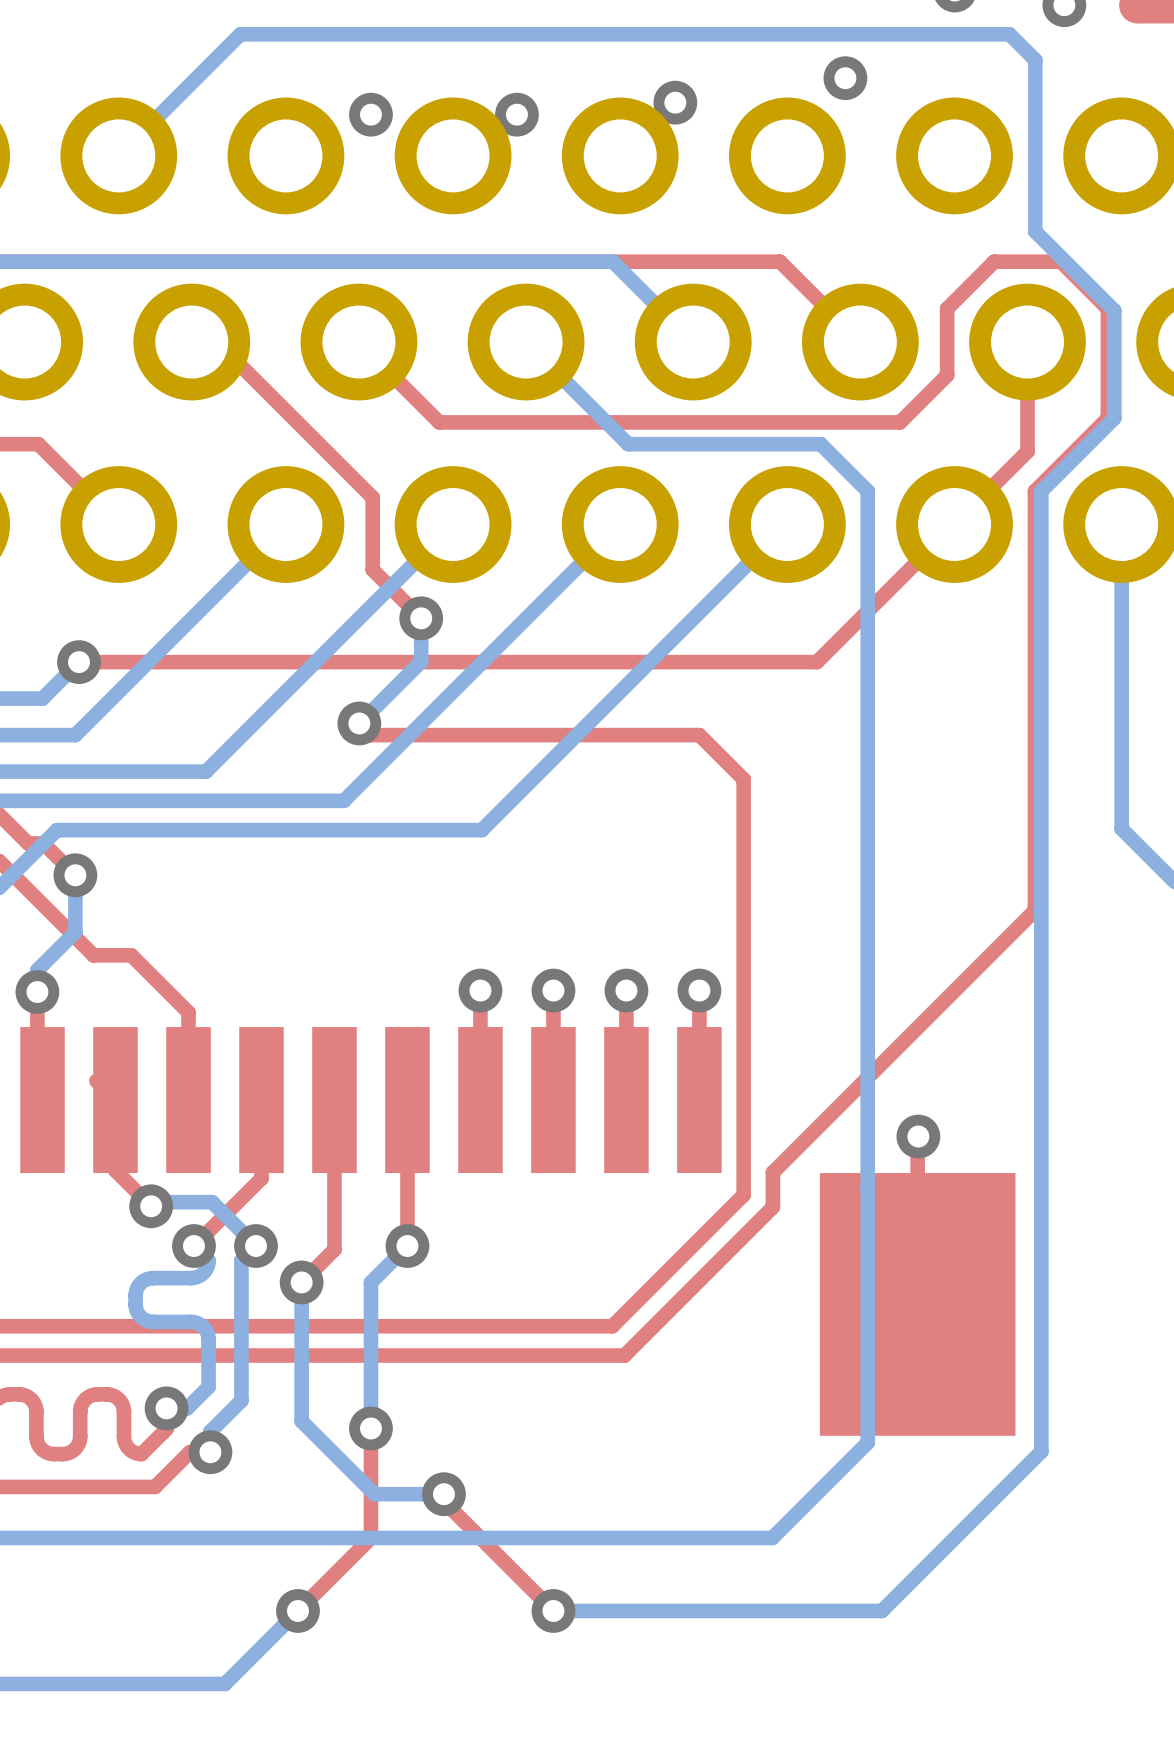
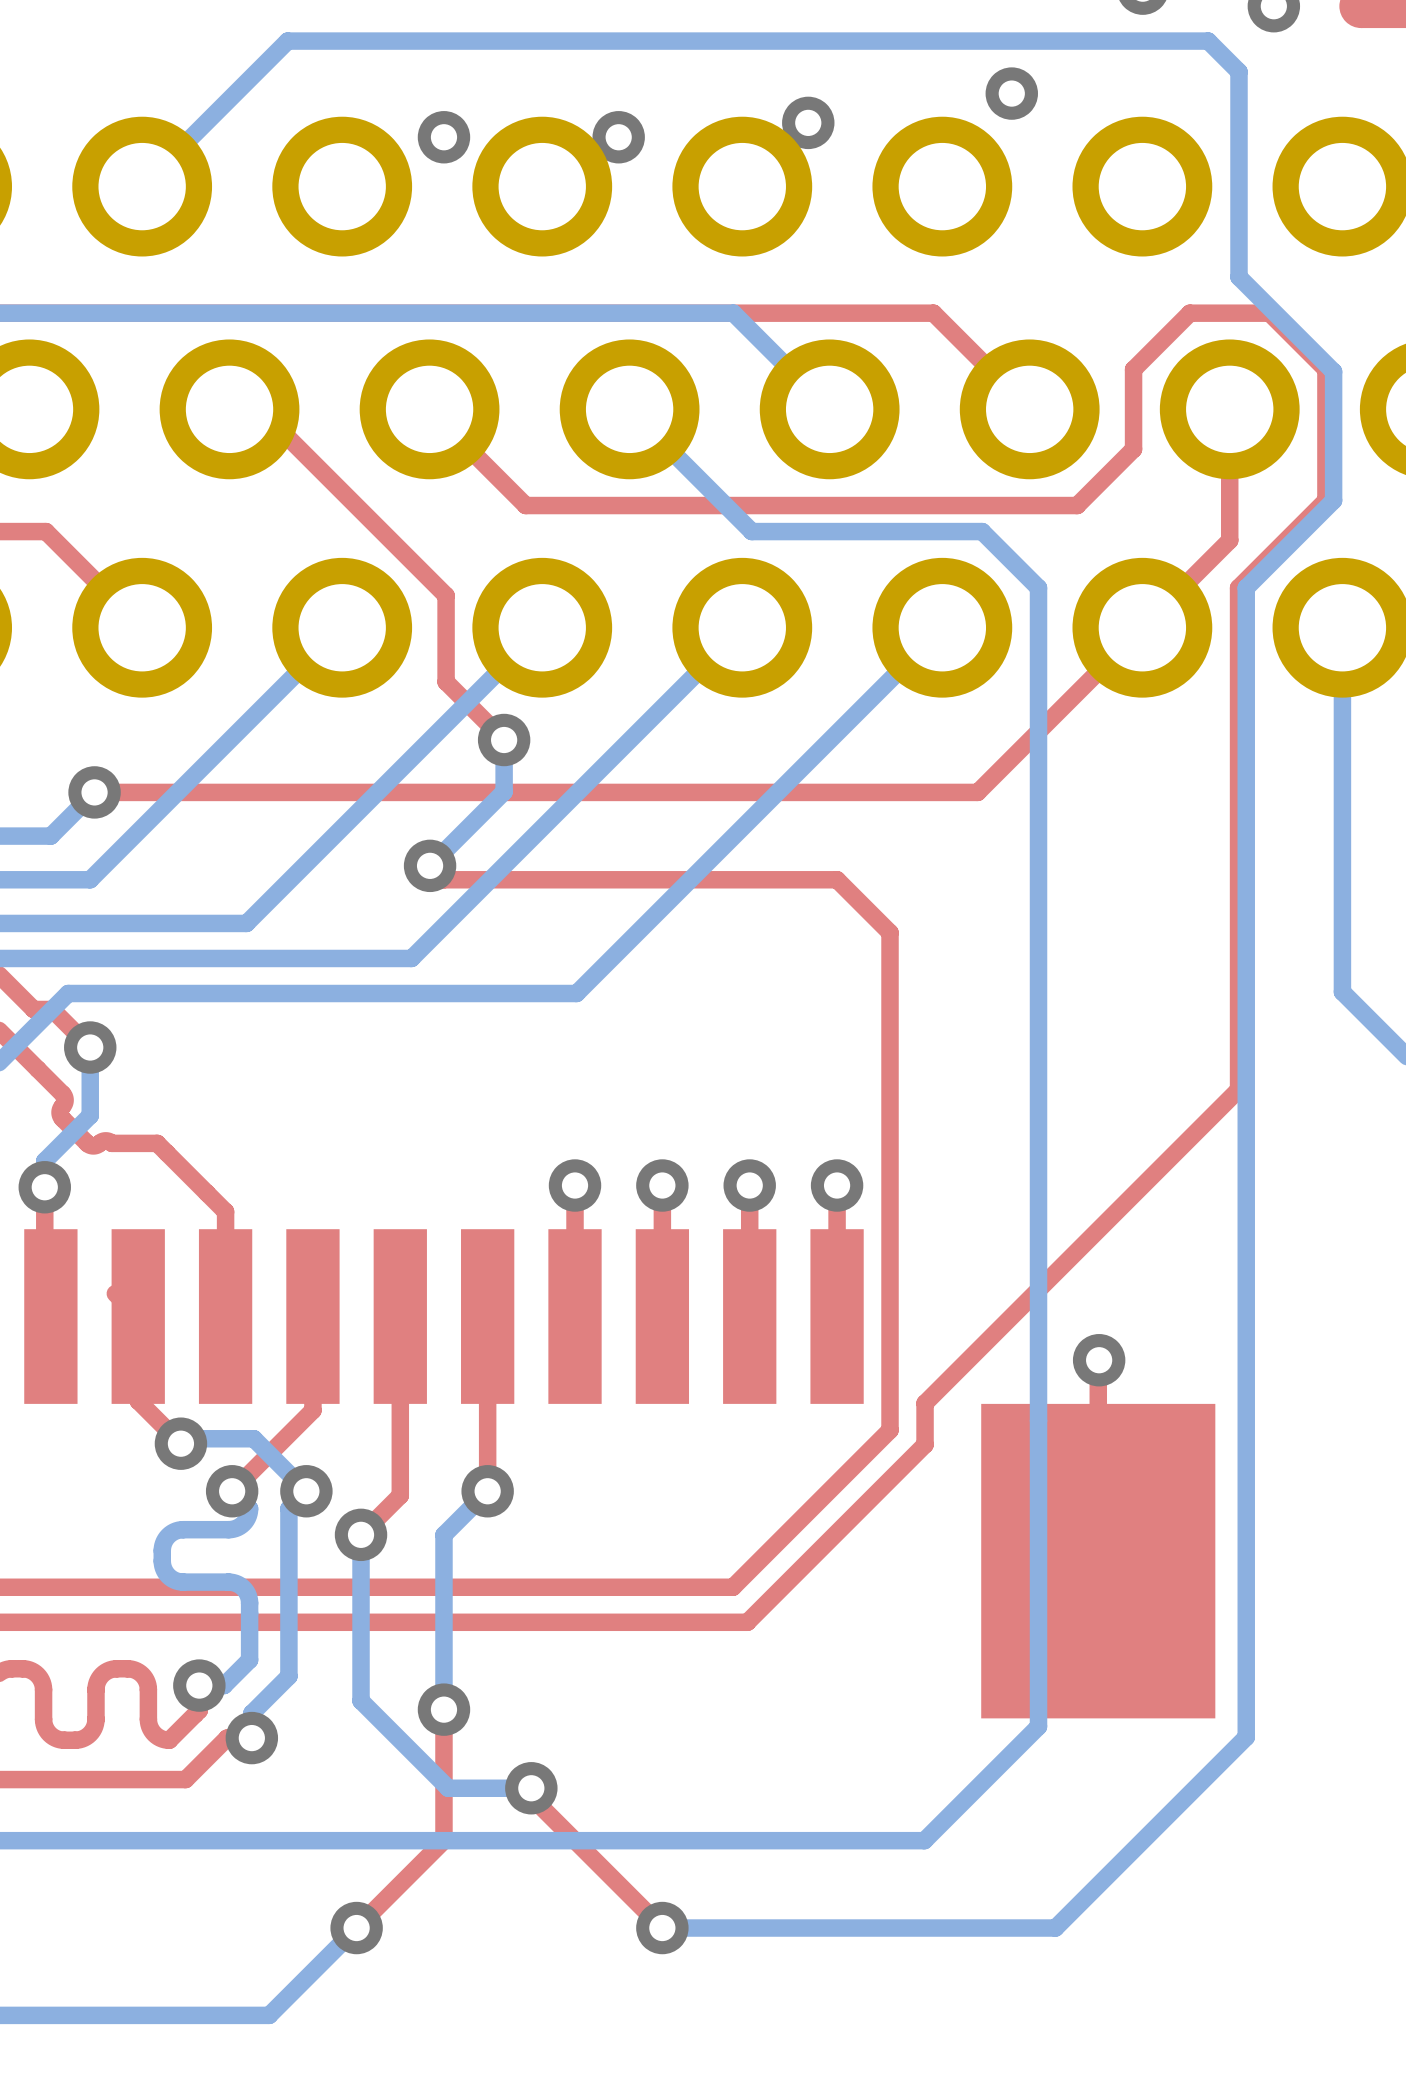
top track: (52, 914) (93, 955) -> (62, 1093) (65, 1100) (60, 1111) (62, 1118) (89, 1144) (95, 1145) (105, 1140) (111, 1143)

